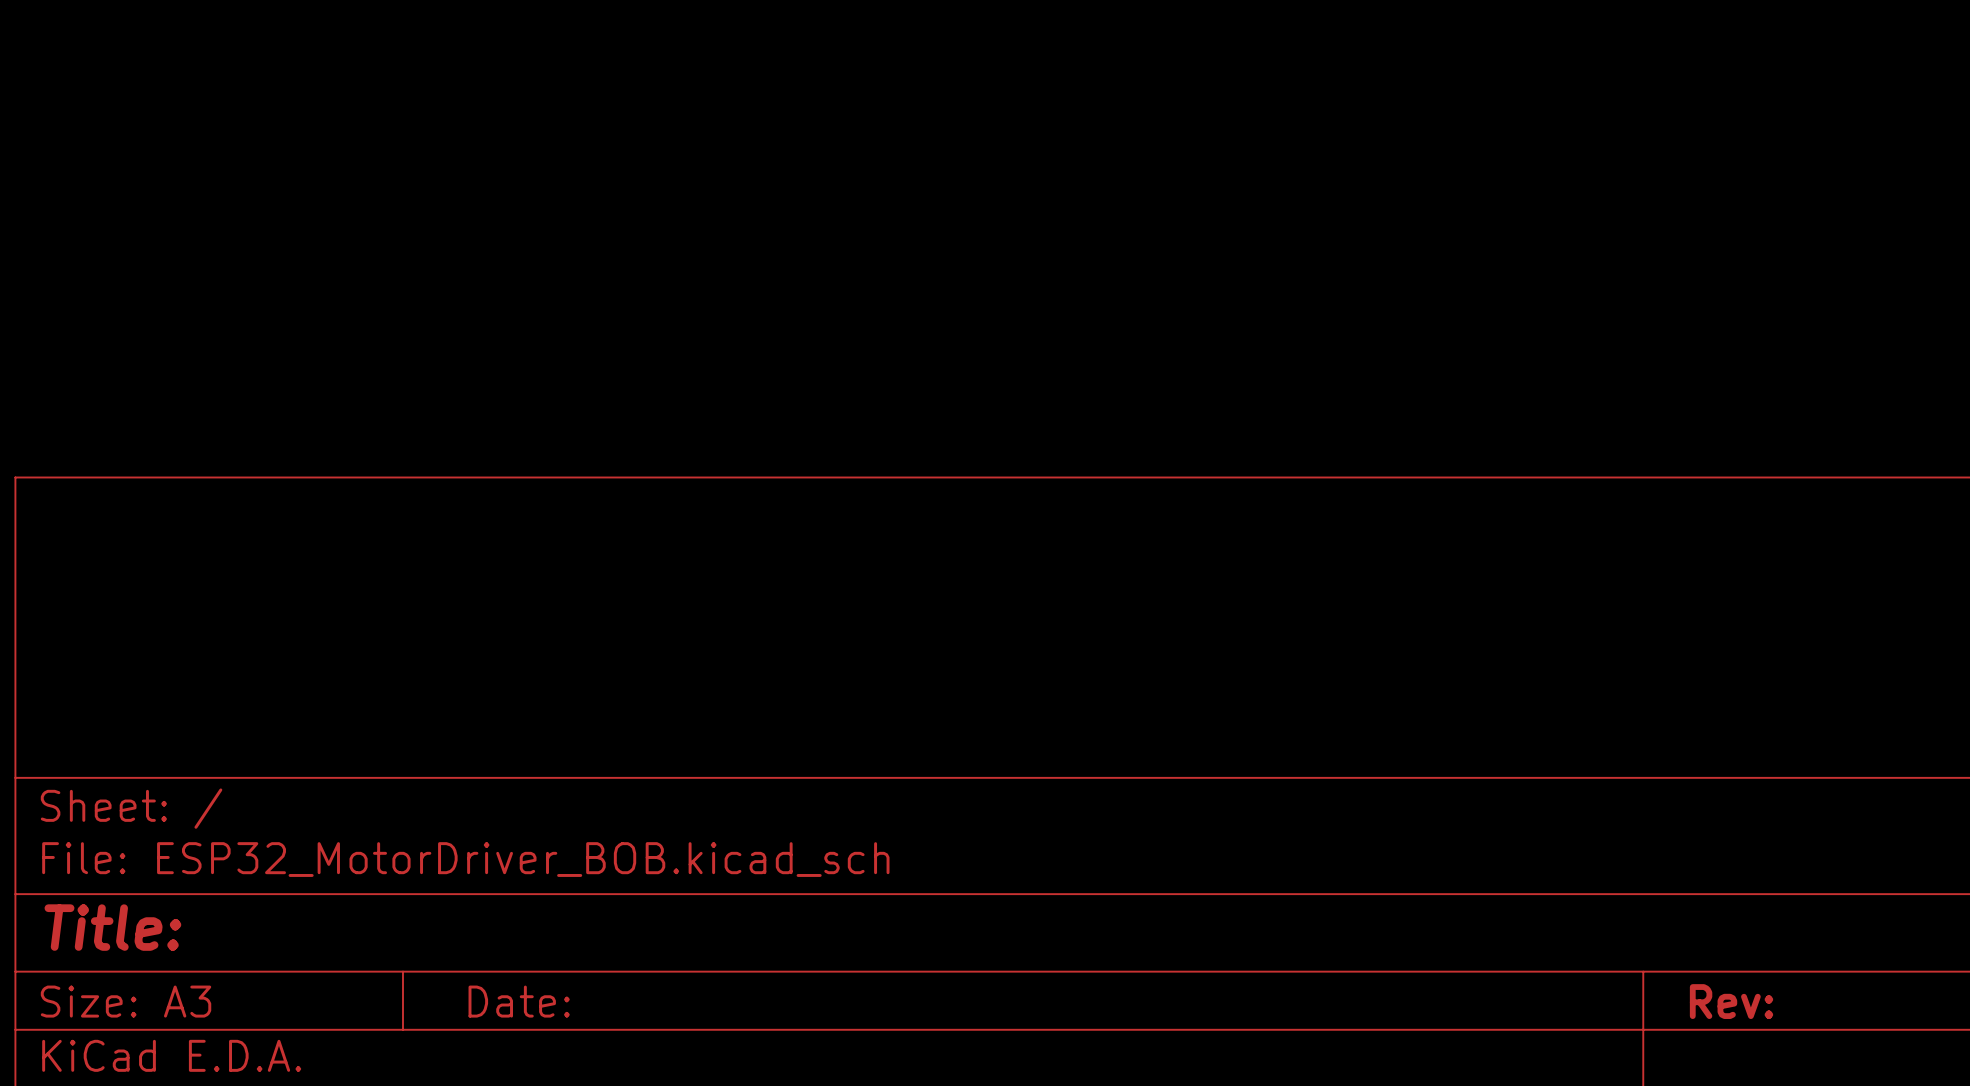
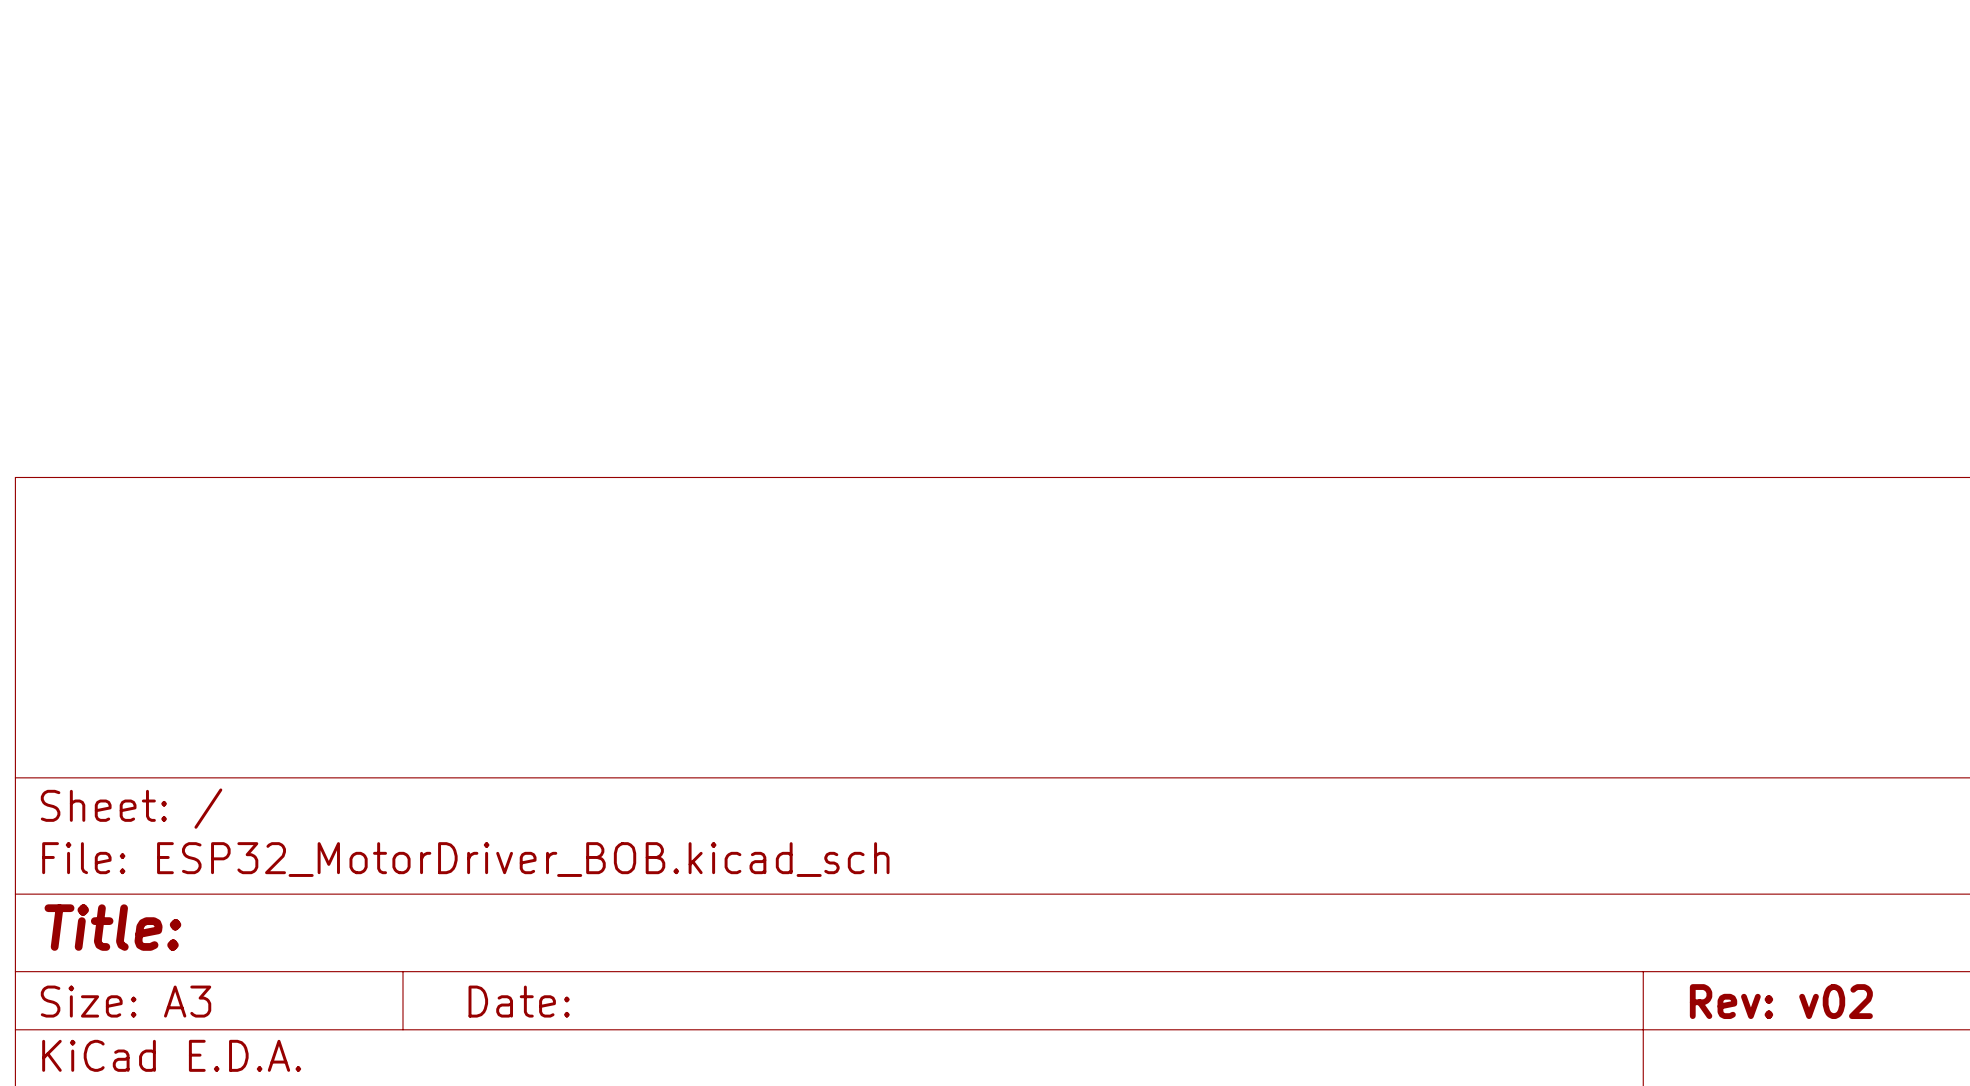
title block: Rev: (1731, 1001) -> Rev: v02 (1781, 1001)

